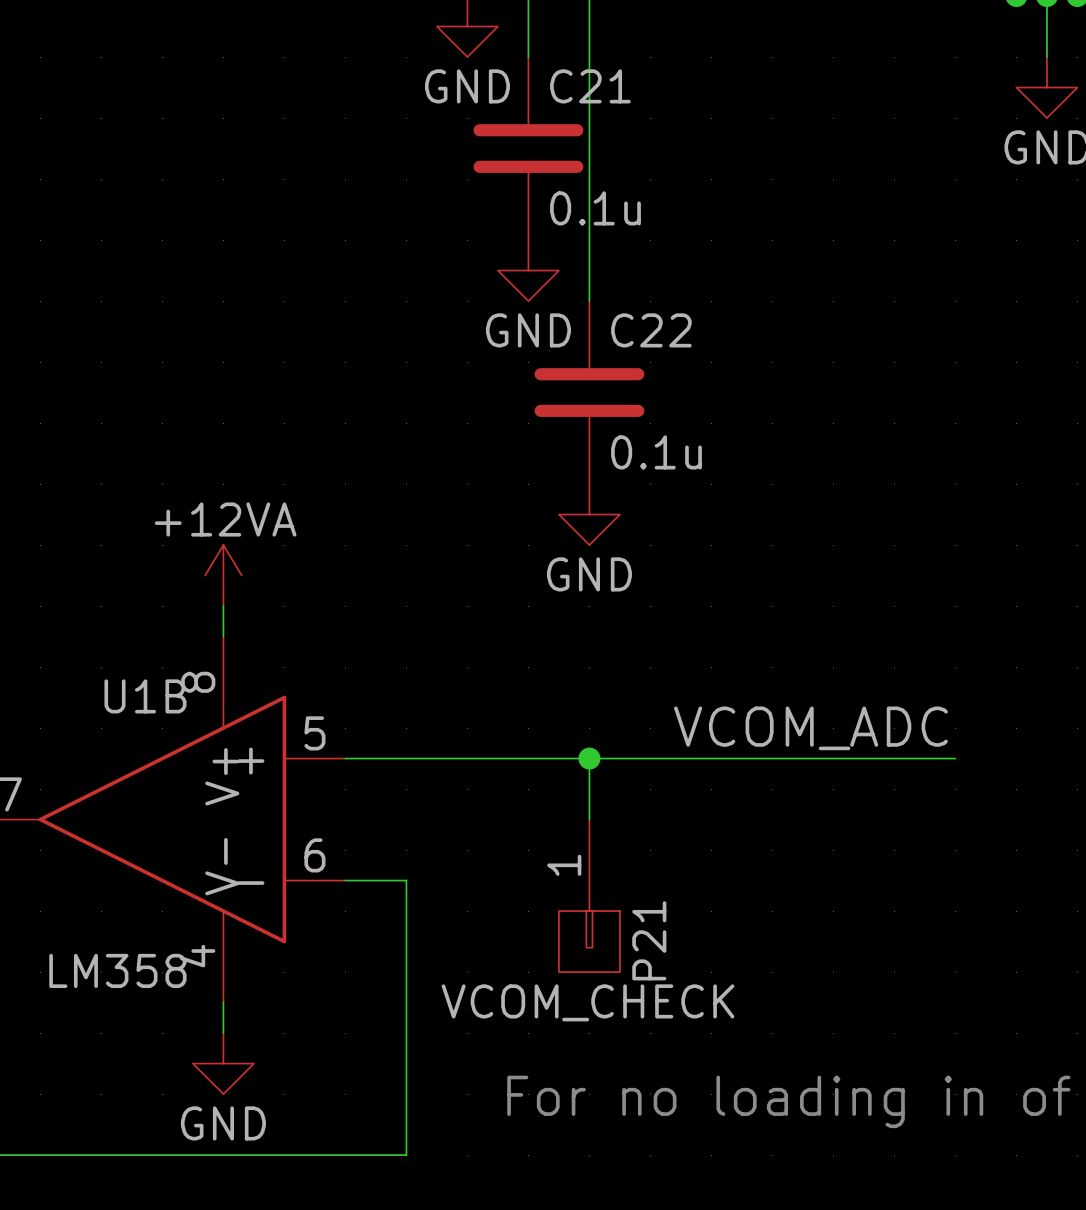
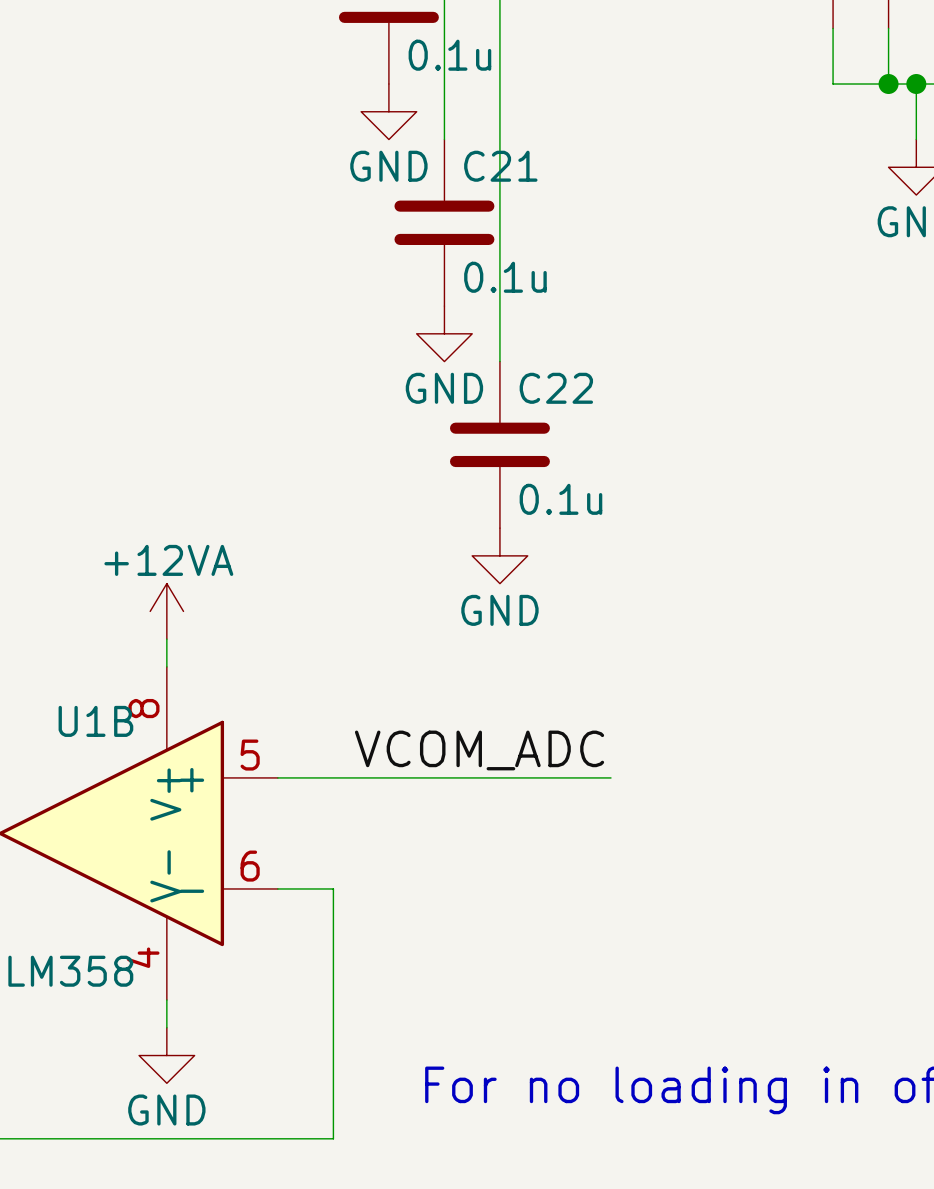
label position: VCOM_ADC (811, 728) -> VCOM_ADC (479, 750)
wire: (589, 758) (589, 819) -> none
junction: (589, 758) -> none
wire: (711, 758) (955, 758) -> none
P21: VCOM_CHECK (589, 895) -> none

